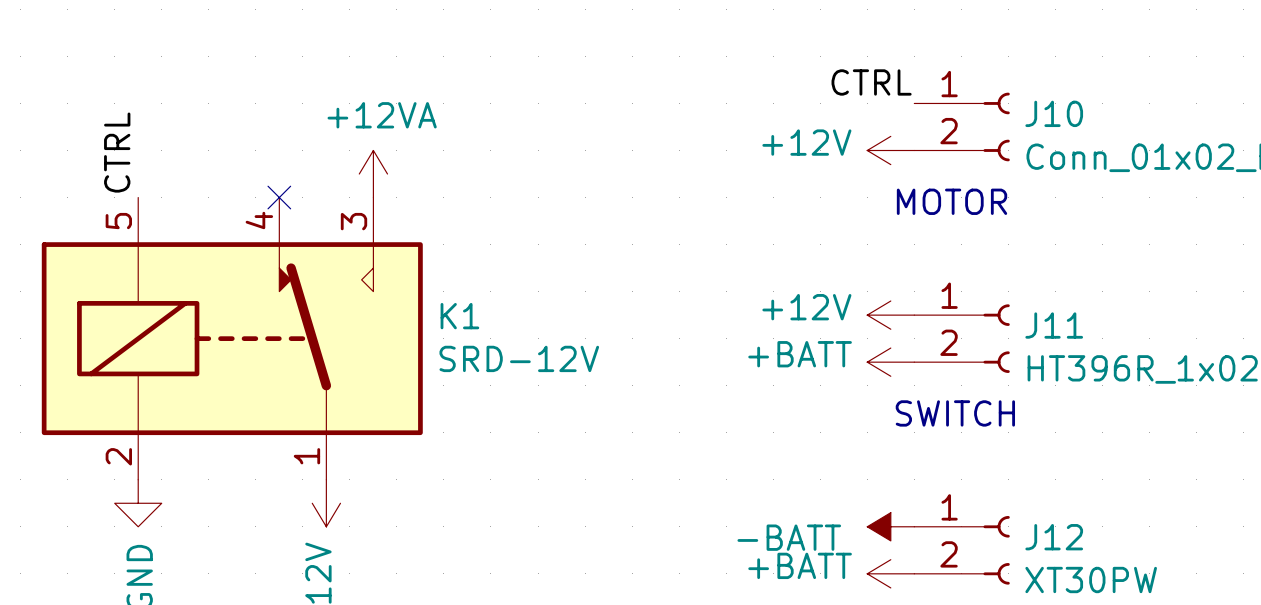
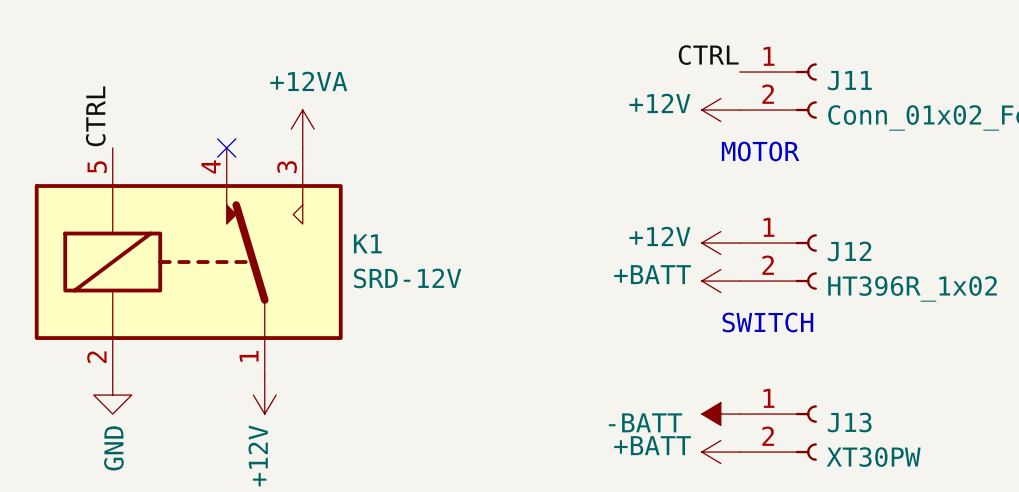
J10 name: J10 (1054, 113) -> J11 (849, 80)
J11 name: J11 (1054, 325) -> J12 (849, 251)
J12 name: J12 (1054, 537) -> J13 (849, 422)

